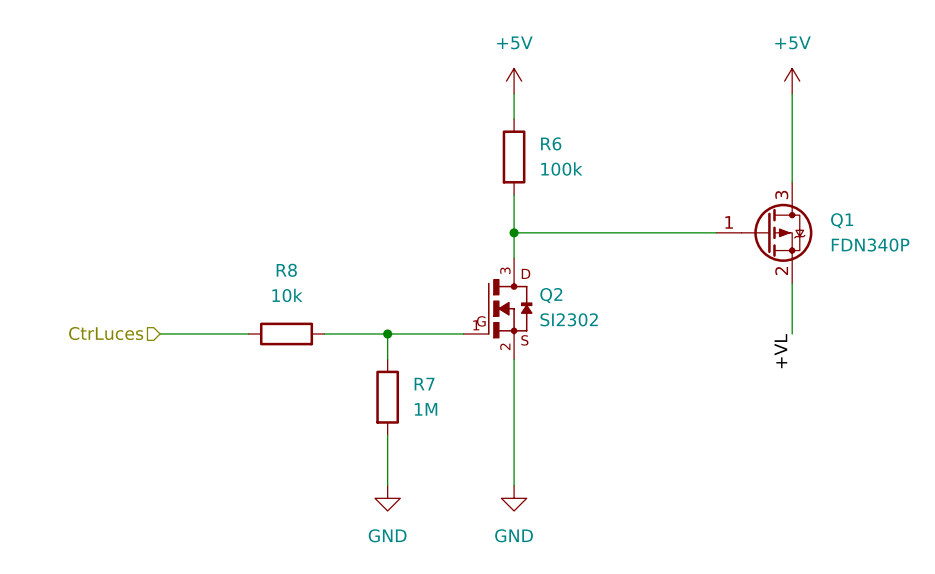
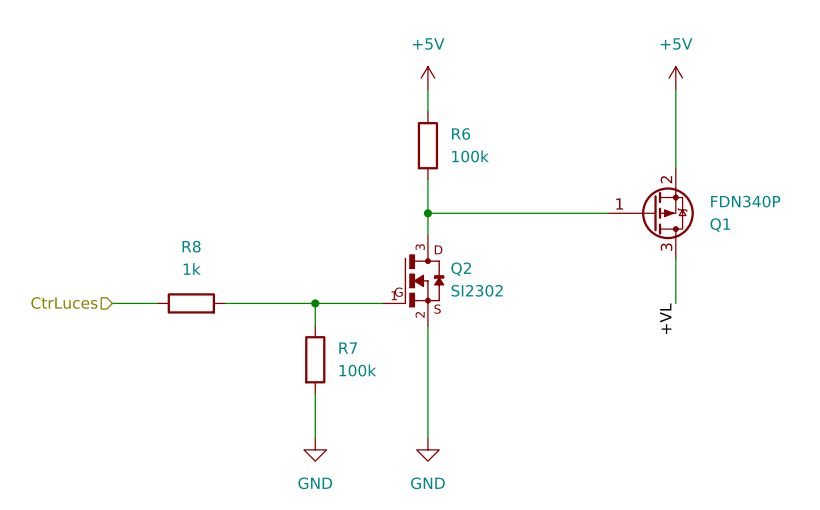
Q1 flip: as is (777, 232) -> up-down (662, 213)
R8 value: 10k (287, 295) -> 1k (192, 268)
wire: (210, 333) (248, 333) -> (225, 303) (258, 303)
R8 position: (286, 333) -> (191, 303)
R7 value: 1M (426, 409) -> 100k (357, 370)

